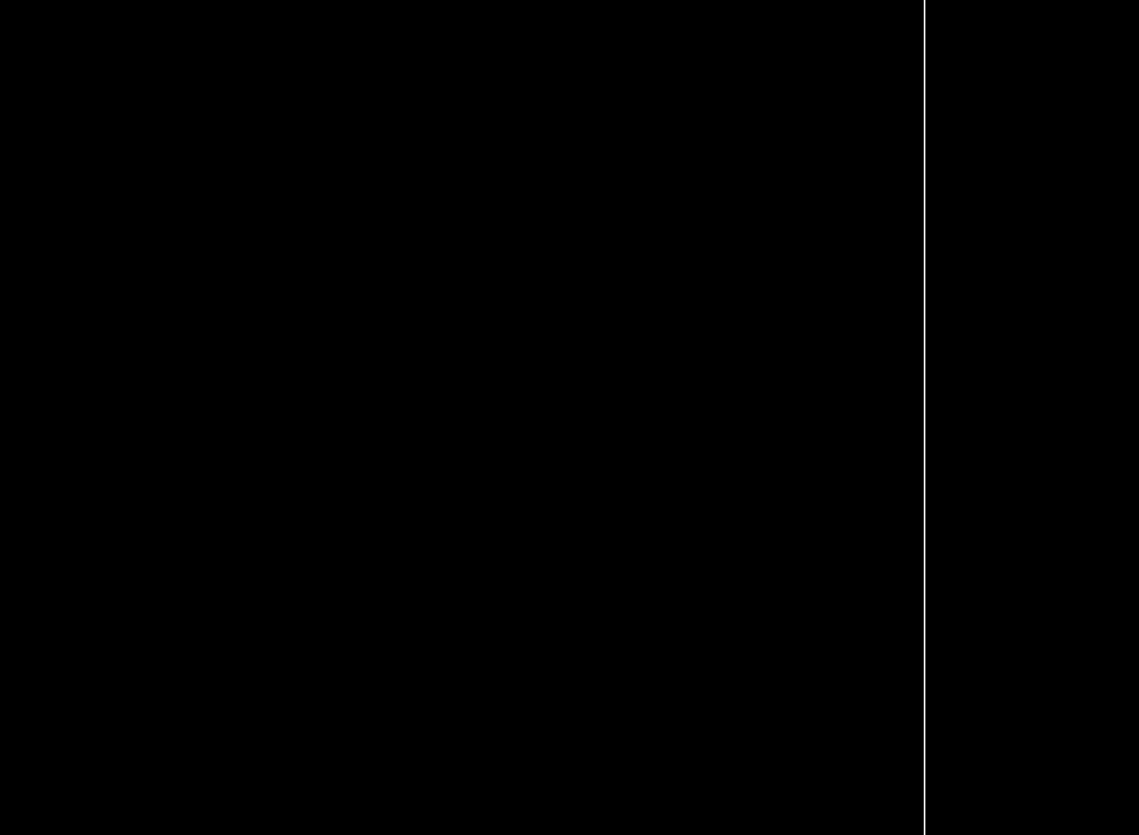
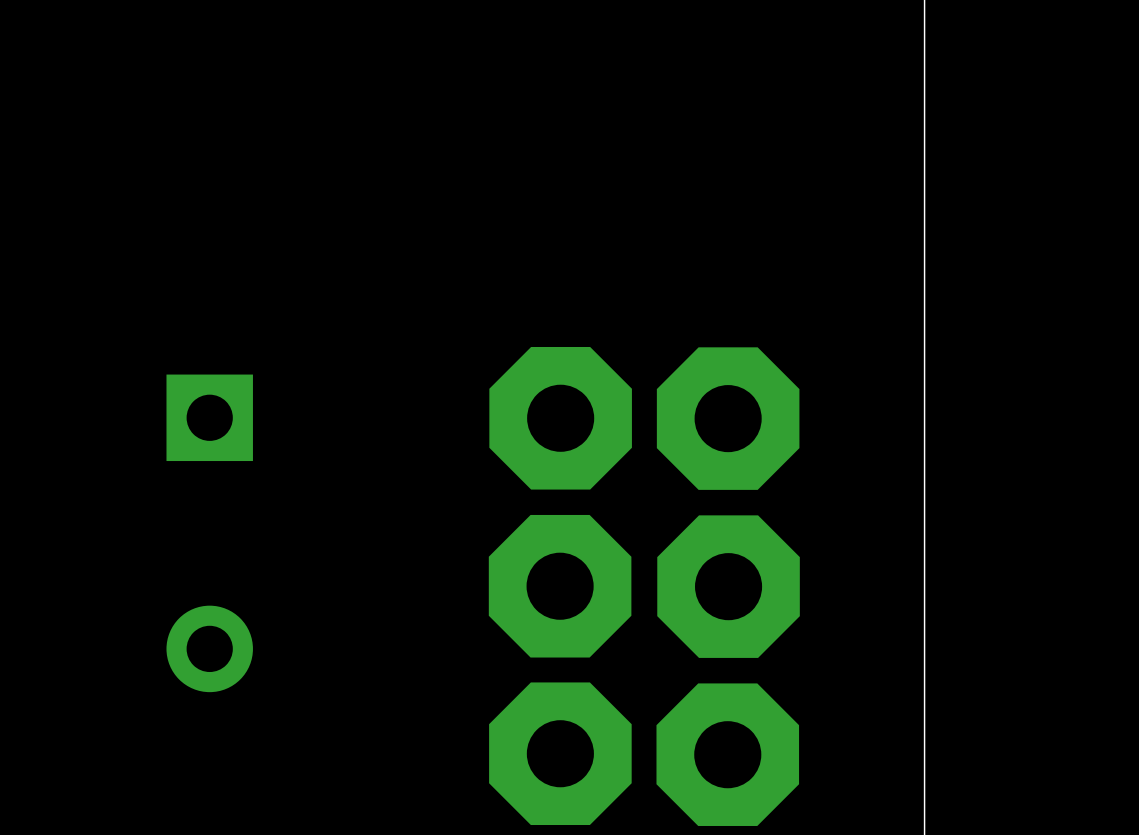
part: none -> (560, 418)
part: none -> (728, 418)
part: none -> (209, 533)
part: none -> (560, 586)
part: none -> (728, 586)
part: none -> (560, 753)
part: none -> (727, 754)

